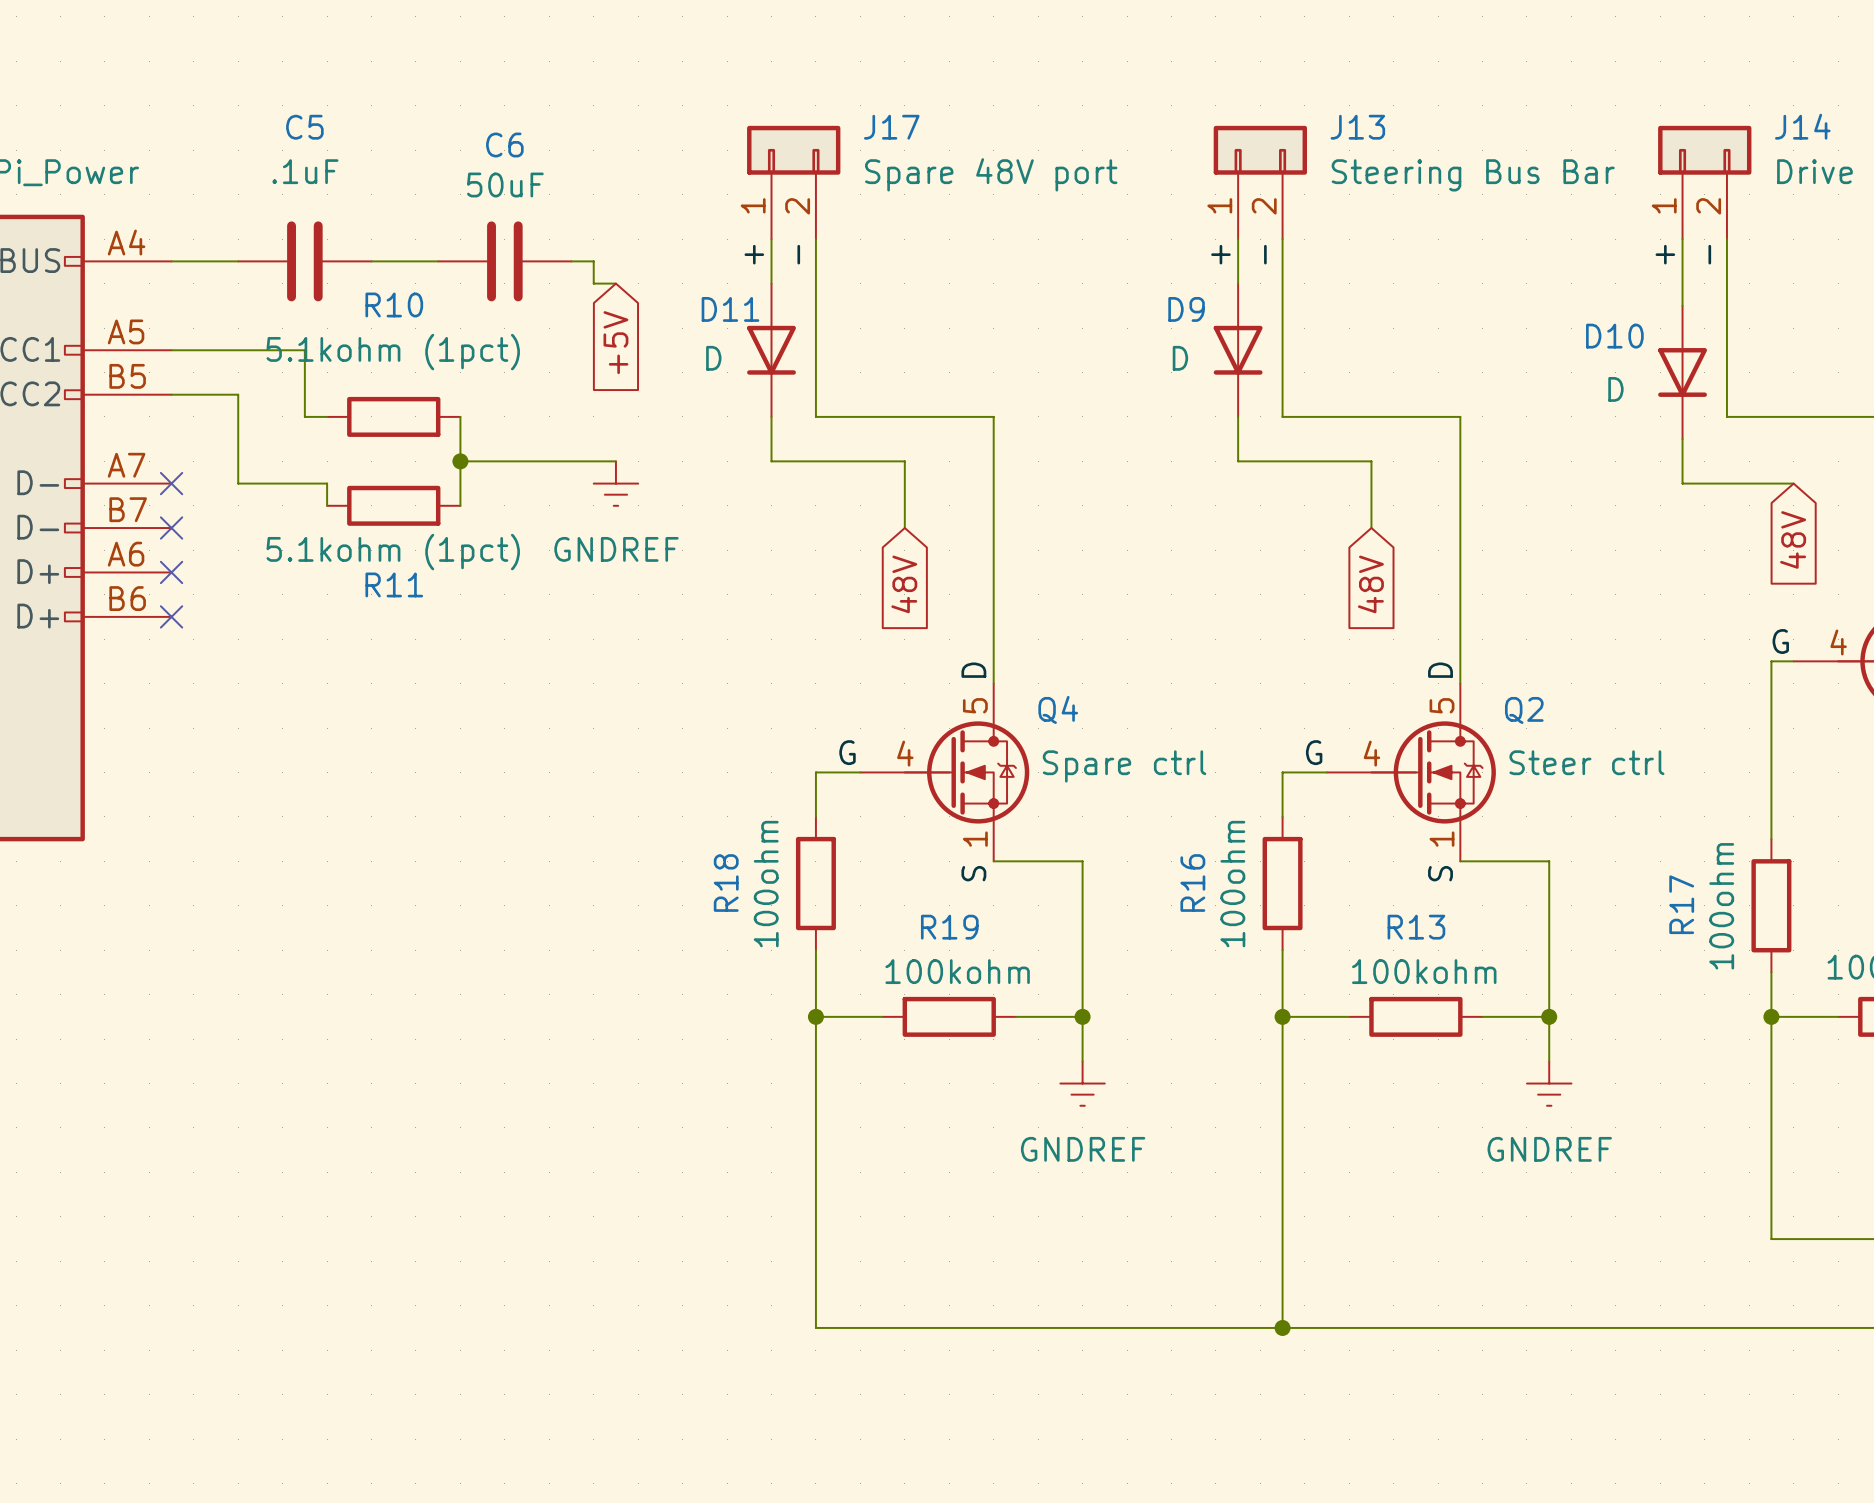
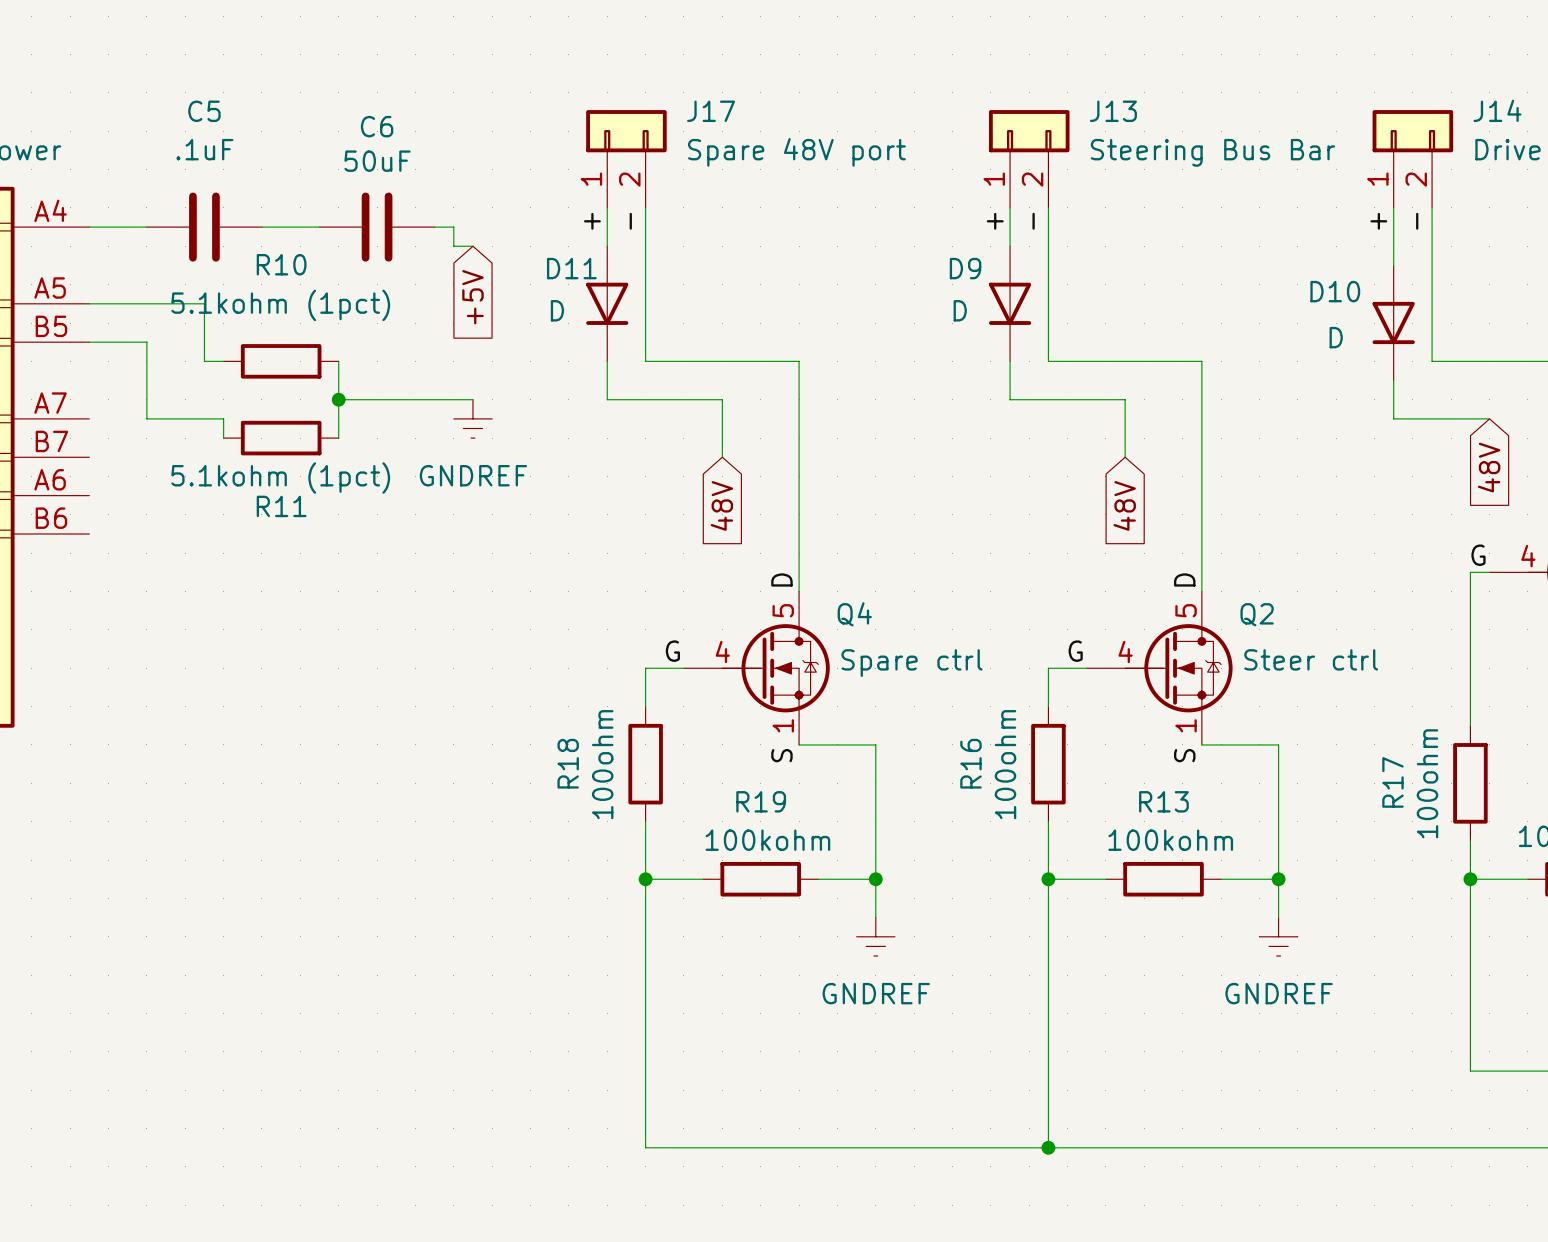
no-connect mark: (171, 483) -> none
no-connect mark: (171, 528) -> none
no-connect mark: (171, 572) -> none
no-connect mark: (171, 616) -> none

